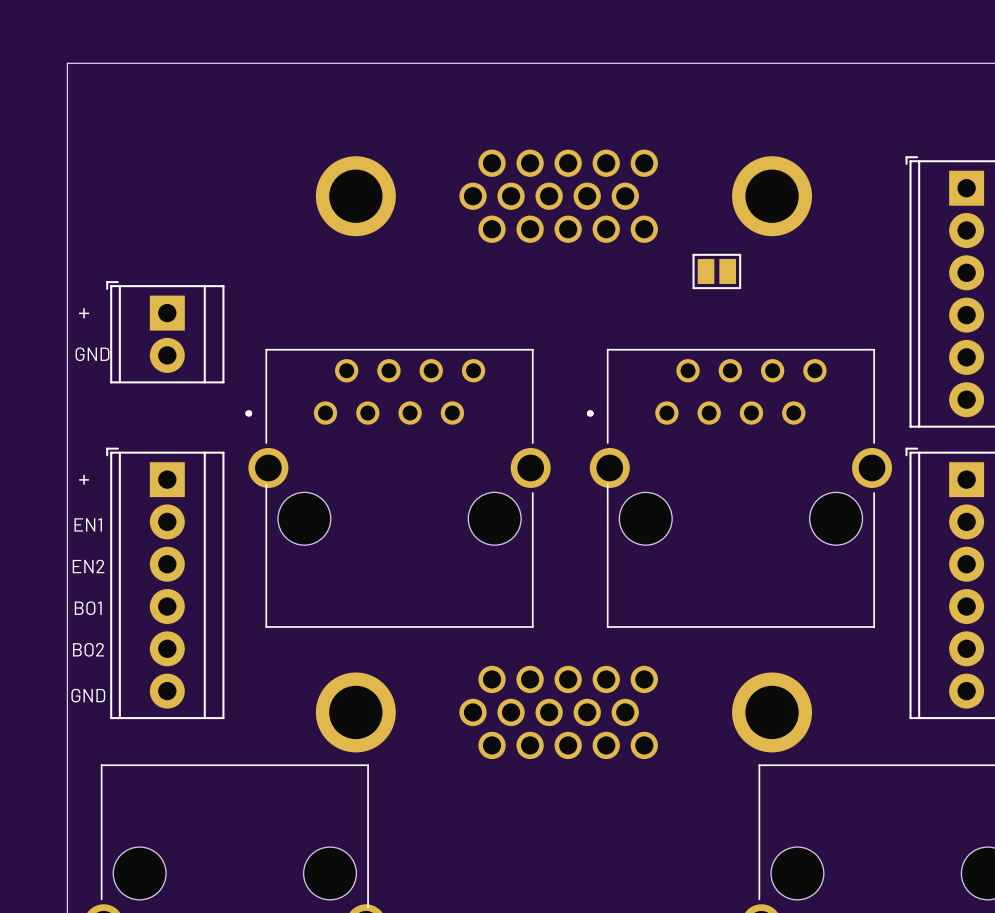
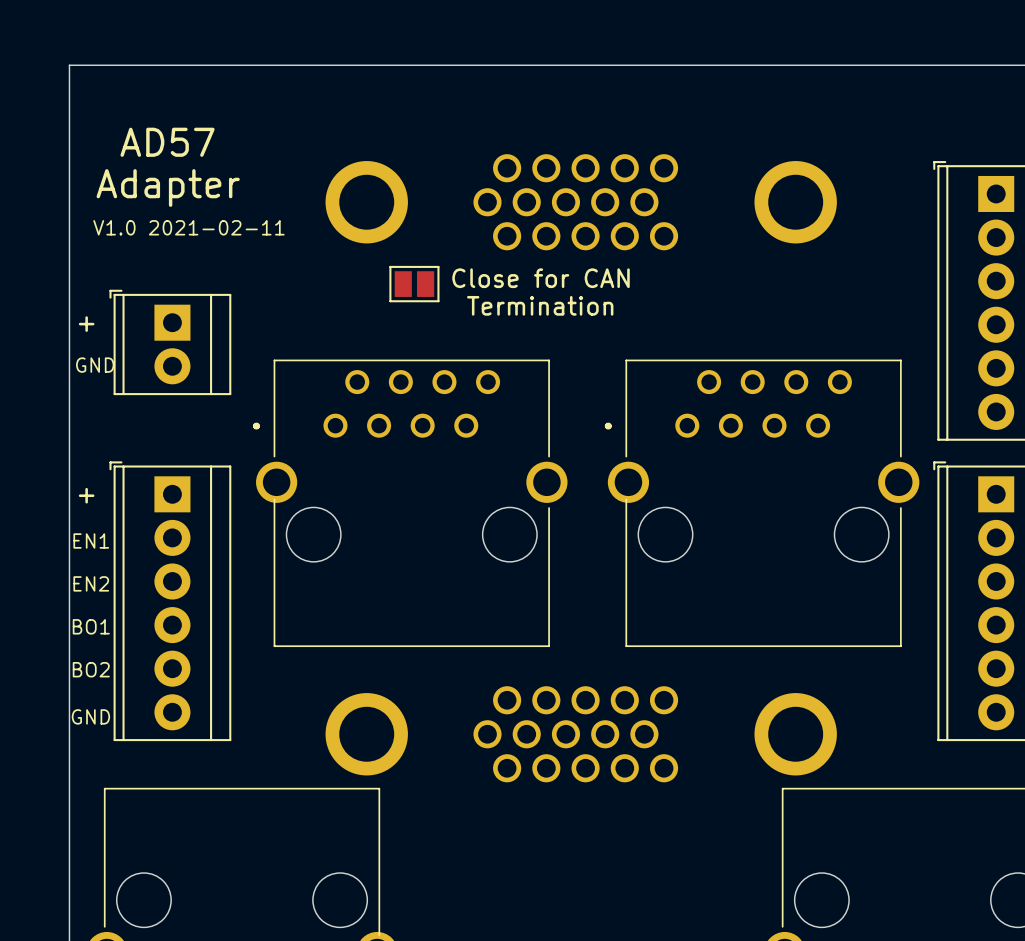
text: none -> AD57 (167, 142)
text: none -> Adapter (168, 188)
text: none -> V1.0 2021-02-11 (188, 227)
text: none -> Close for CAN (541, 278)
part position: (716, 271) -> (414, 284)
text: none -> Termination (540, 305)

